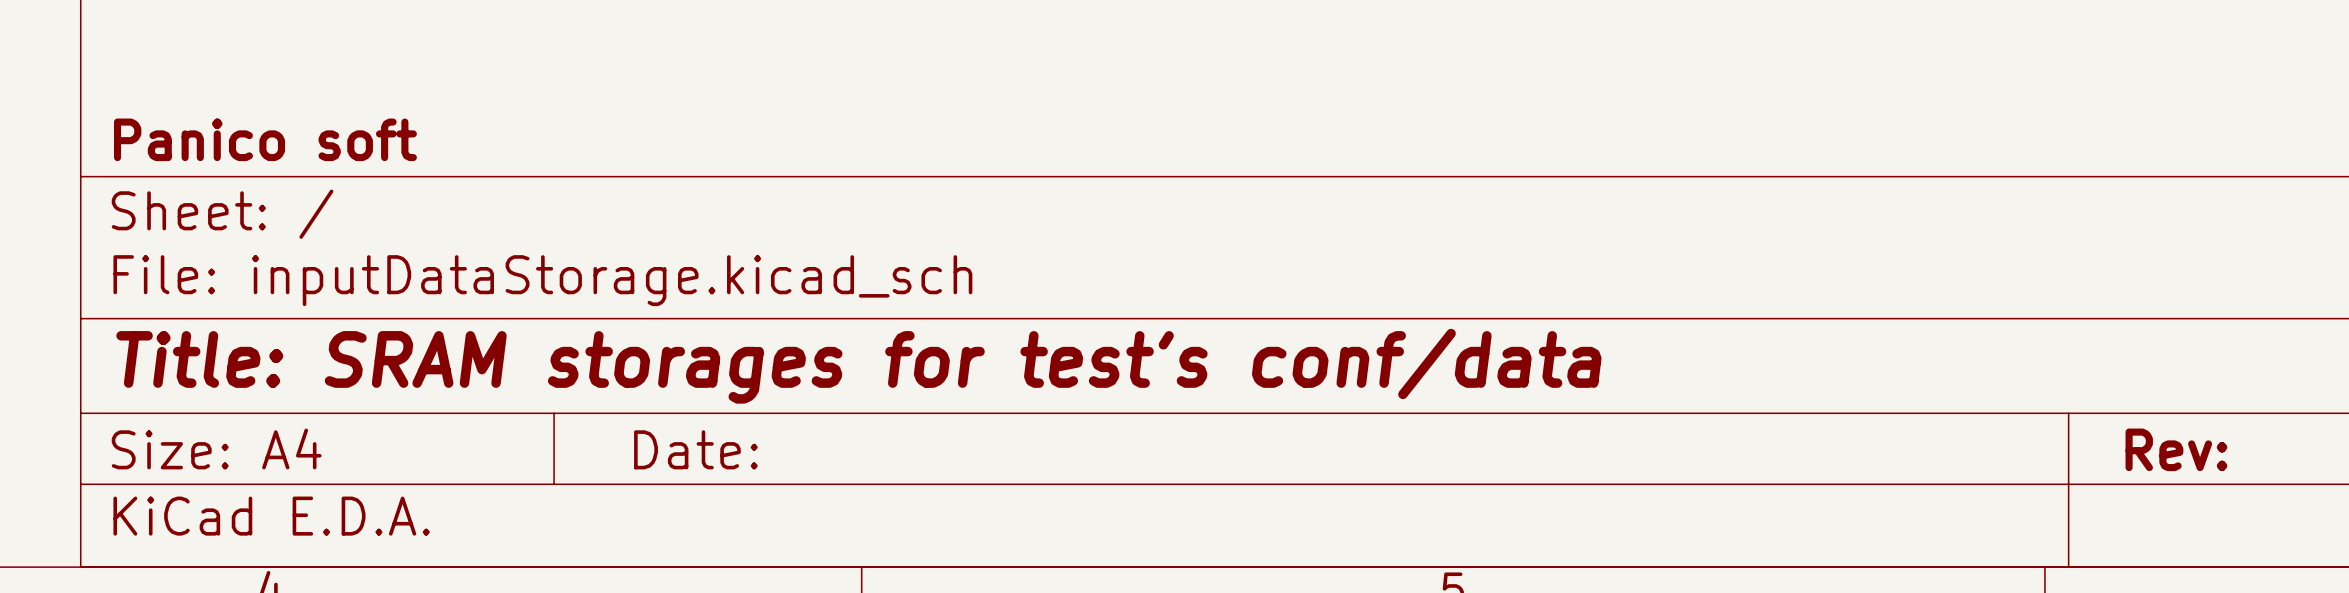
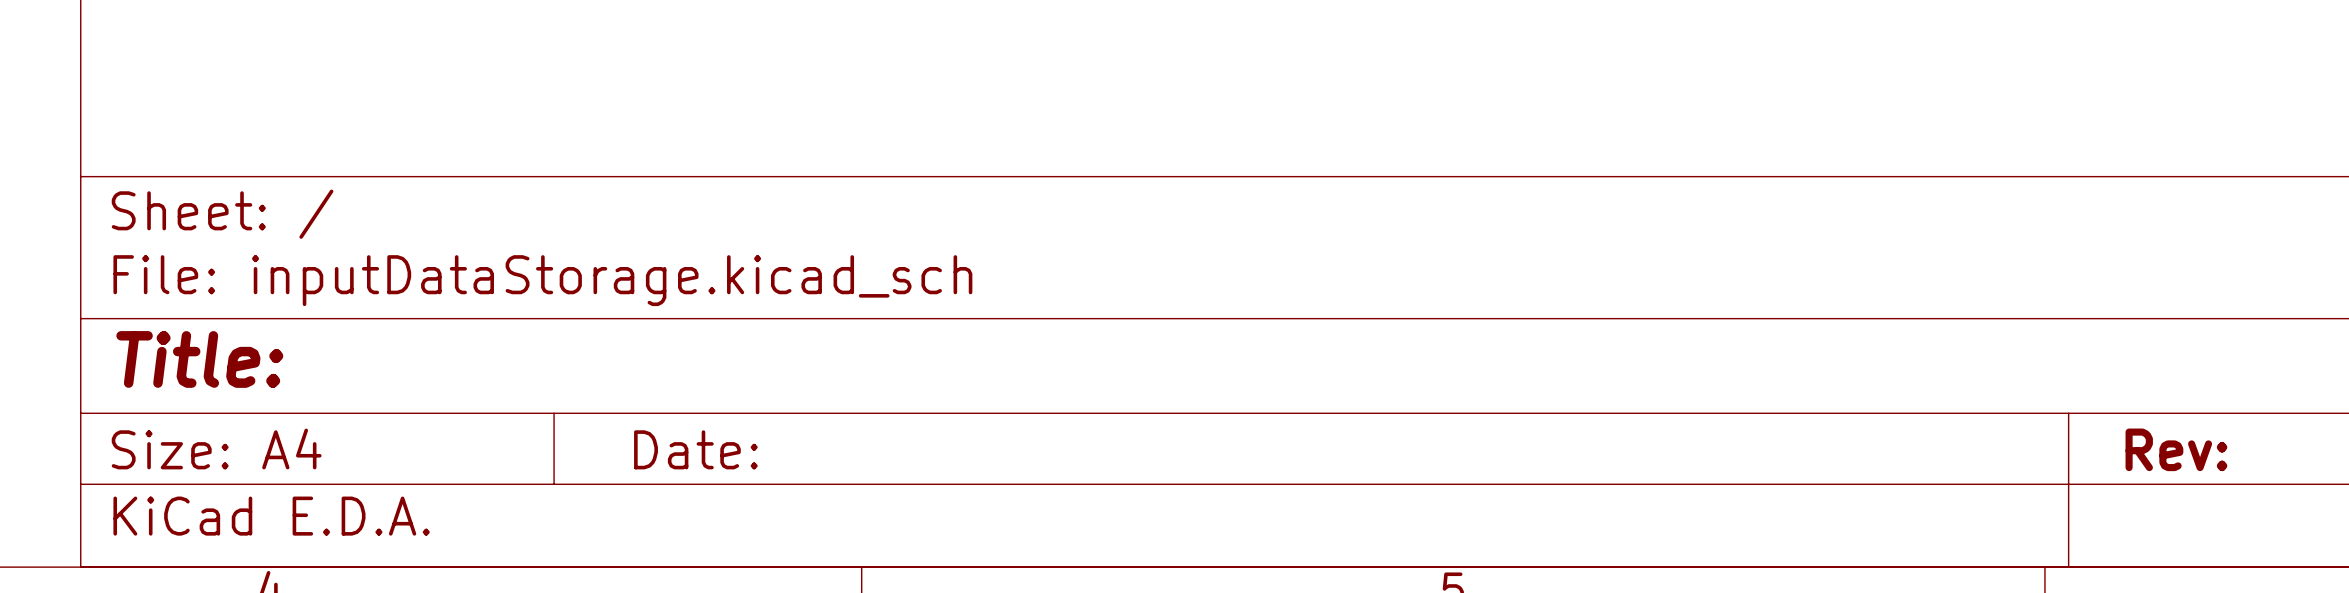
title block: Panico soft (265, 139) -> none
title block: Title: SRAM storages for test's conf/data (858, 366) -> Title: (199, 359)

